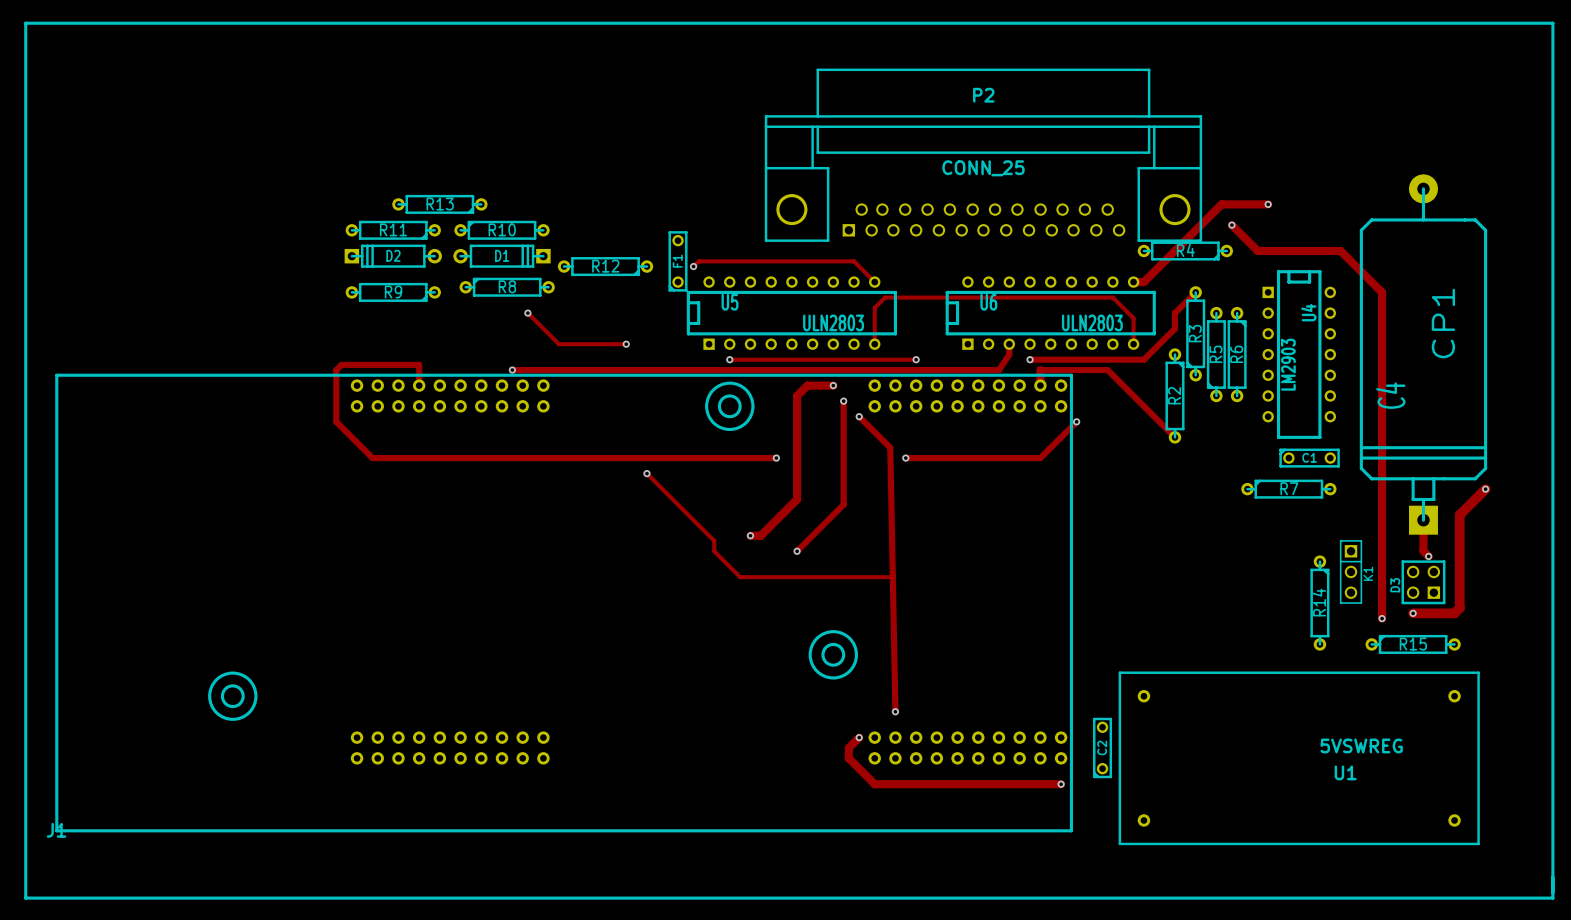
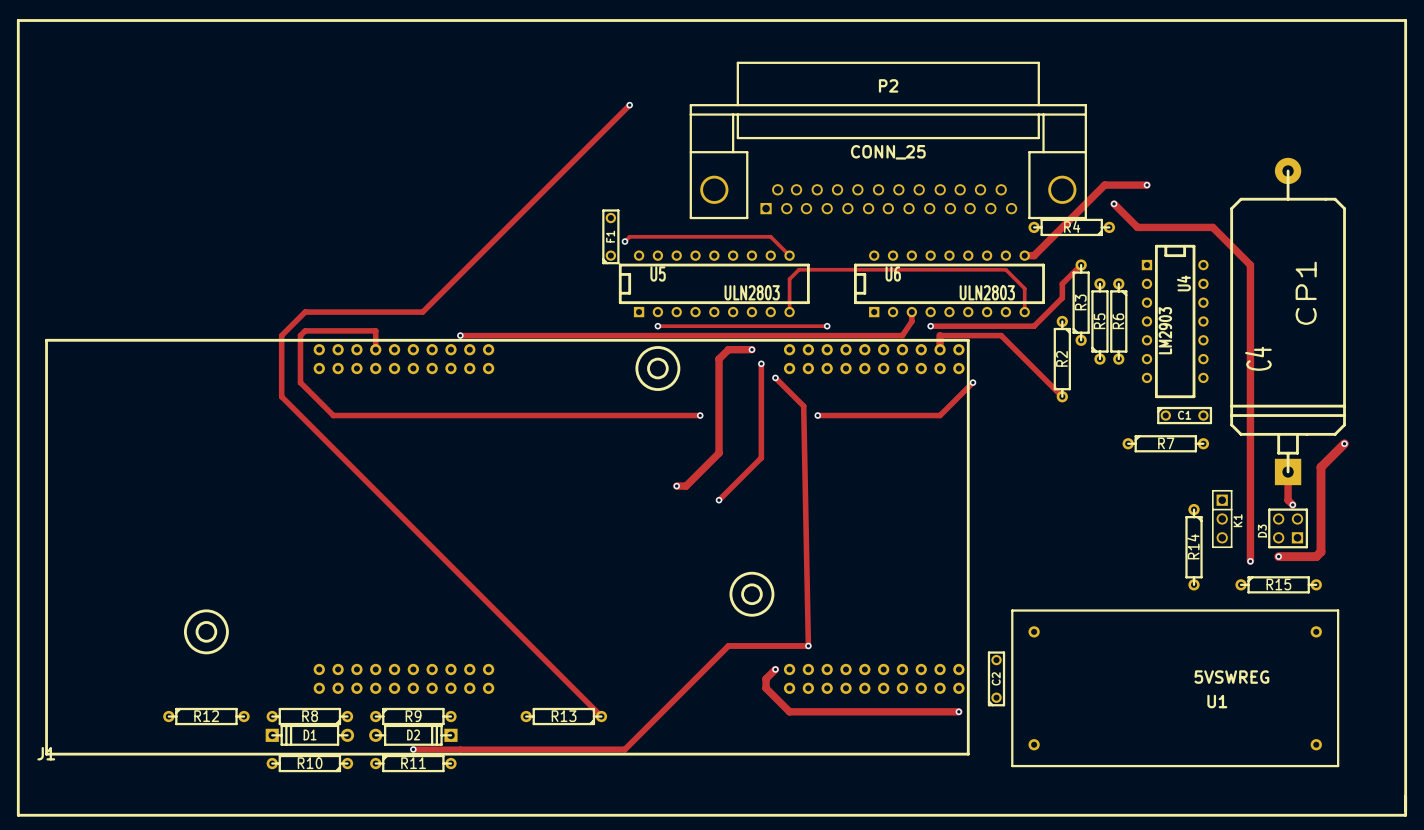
track: none -> (629, 105) (422, 312) (305, 312) (281, 335) (281, 396) (601, 716)
via: none -> (629, 105)
R13 position: (439, 204) -> (563, 716)
R11 rotation: 0° (393, 230) -> 180° (413, 763)
R11 position: (393, 230) -> (413, 763)
R10 rotation: 0° (502, 230) -> 180° (309, 763)
R10 position: (502, 230) -> (309, 763)
D2 rotation: 0° (393, 256) -> 180° (413, 735)
D2 position: (393, 256) -> (413, 735)
D1 rotation: 0° (502, 256) -> 180° (309, 735)
D1 position: (502, 256) -> (309, 735)
R12 rotation: 0° (605, 266) -> 180° (206, 716)
R12 position: (605, 266) -> (206, 716)
R8 rotation: 0° (507, 287) -> 180° (309, 716)
R8 position: (507, 287) -> (309, 716)
R9 rotation: 0° (393, 292) -> 180° (413, 716)
R9 position: (393, 292) -> (413, 716)
track: (527, 313) (558, 344) (626, 344) -> none
via: (527, 313) -> none
via: (626, 344) -> none
track: (646, 473) (714, 540) (714, 551) (740, 577) (892, 577) -> none
via: (646, 473) -> none
track: none -> (808, 645) (728, 645) (624, 749) (413, 749)
via: none -> (413, 749)

